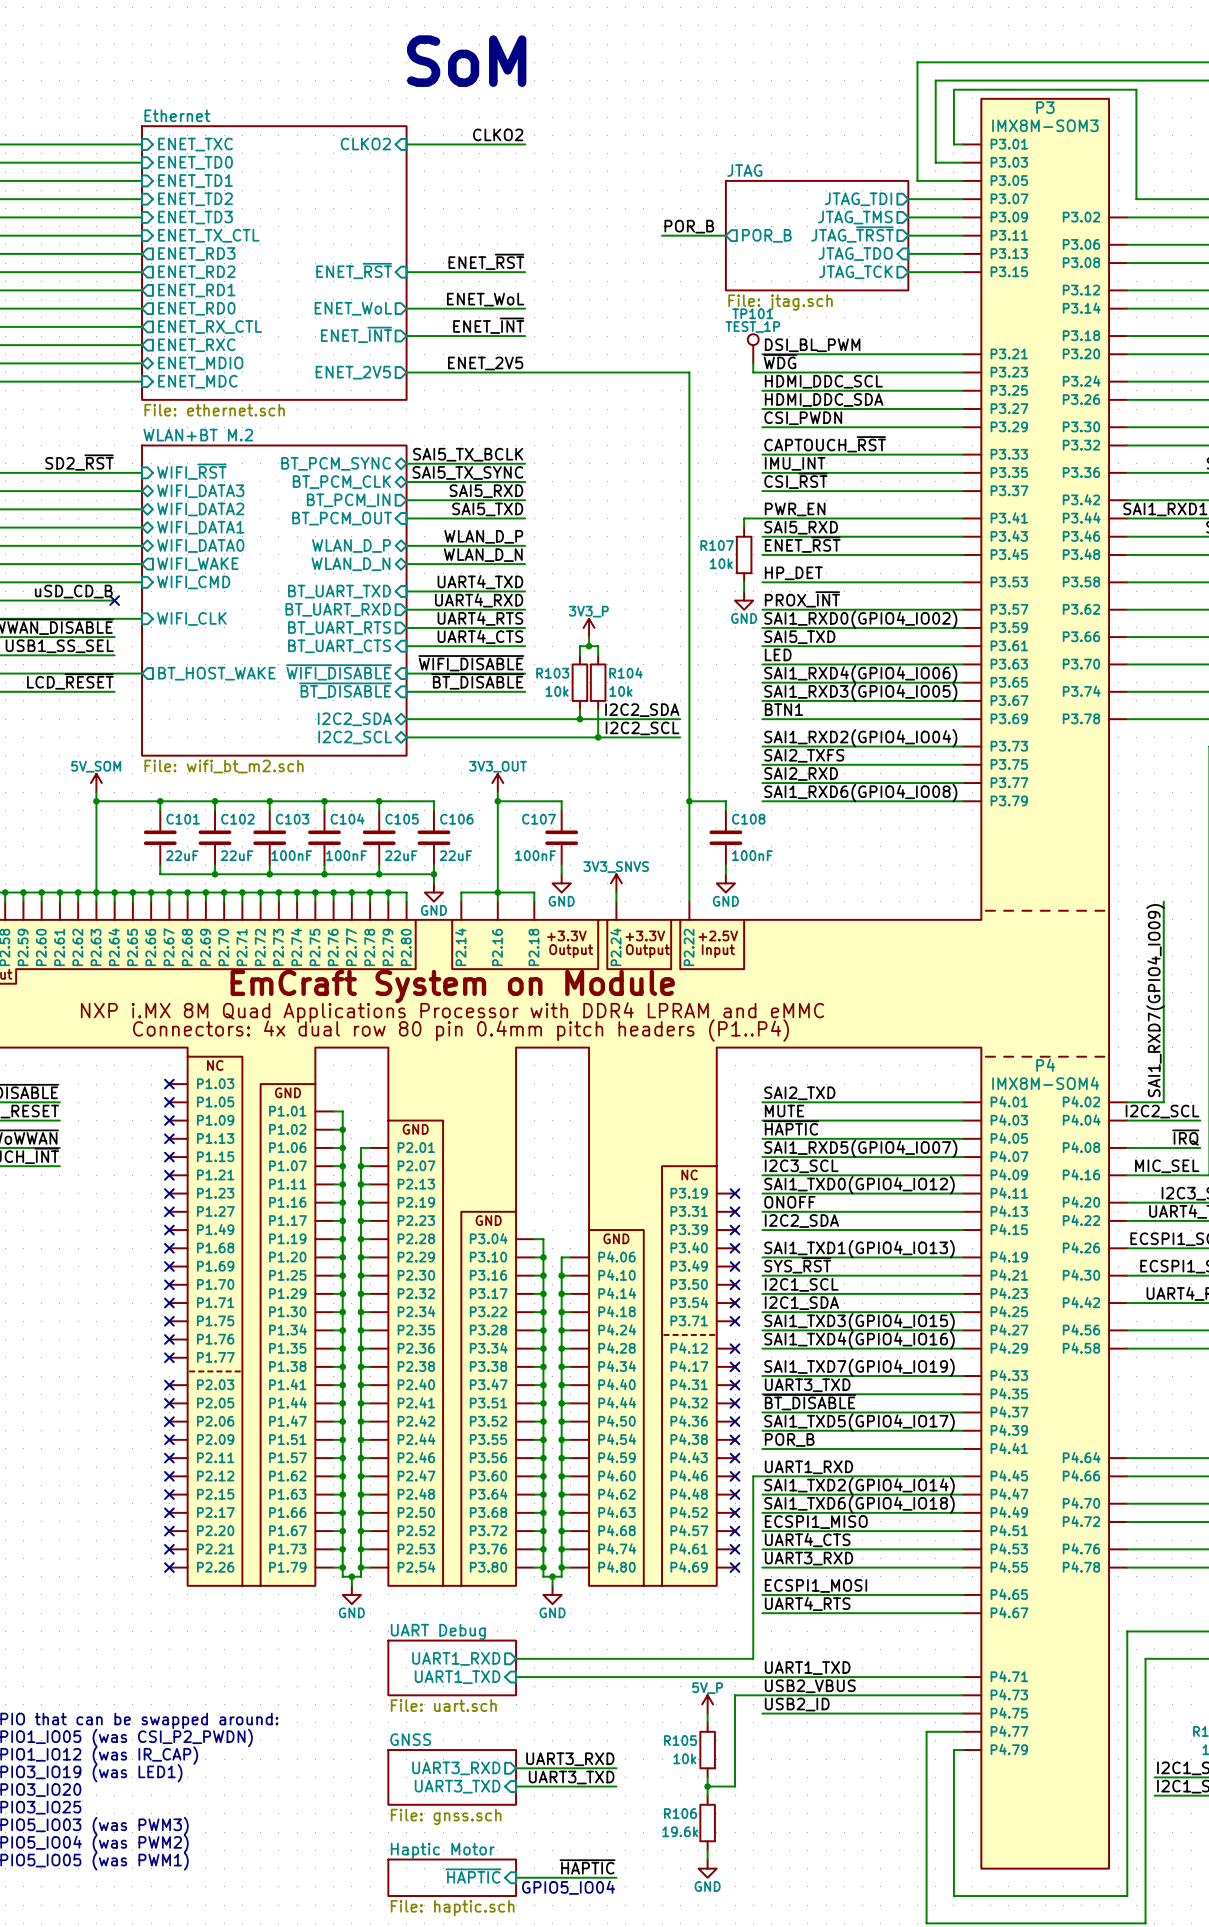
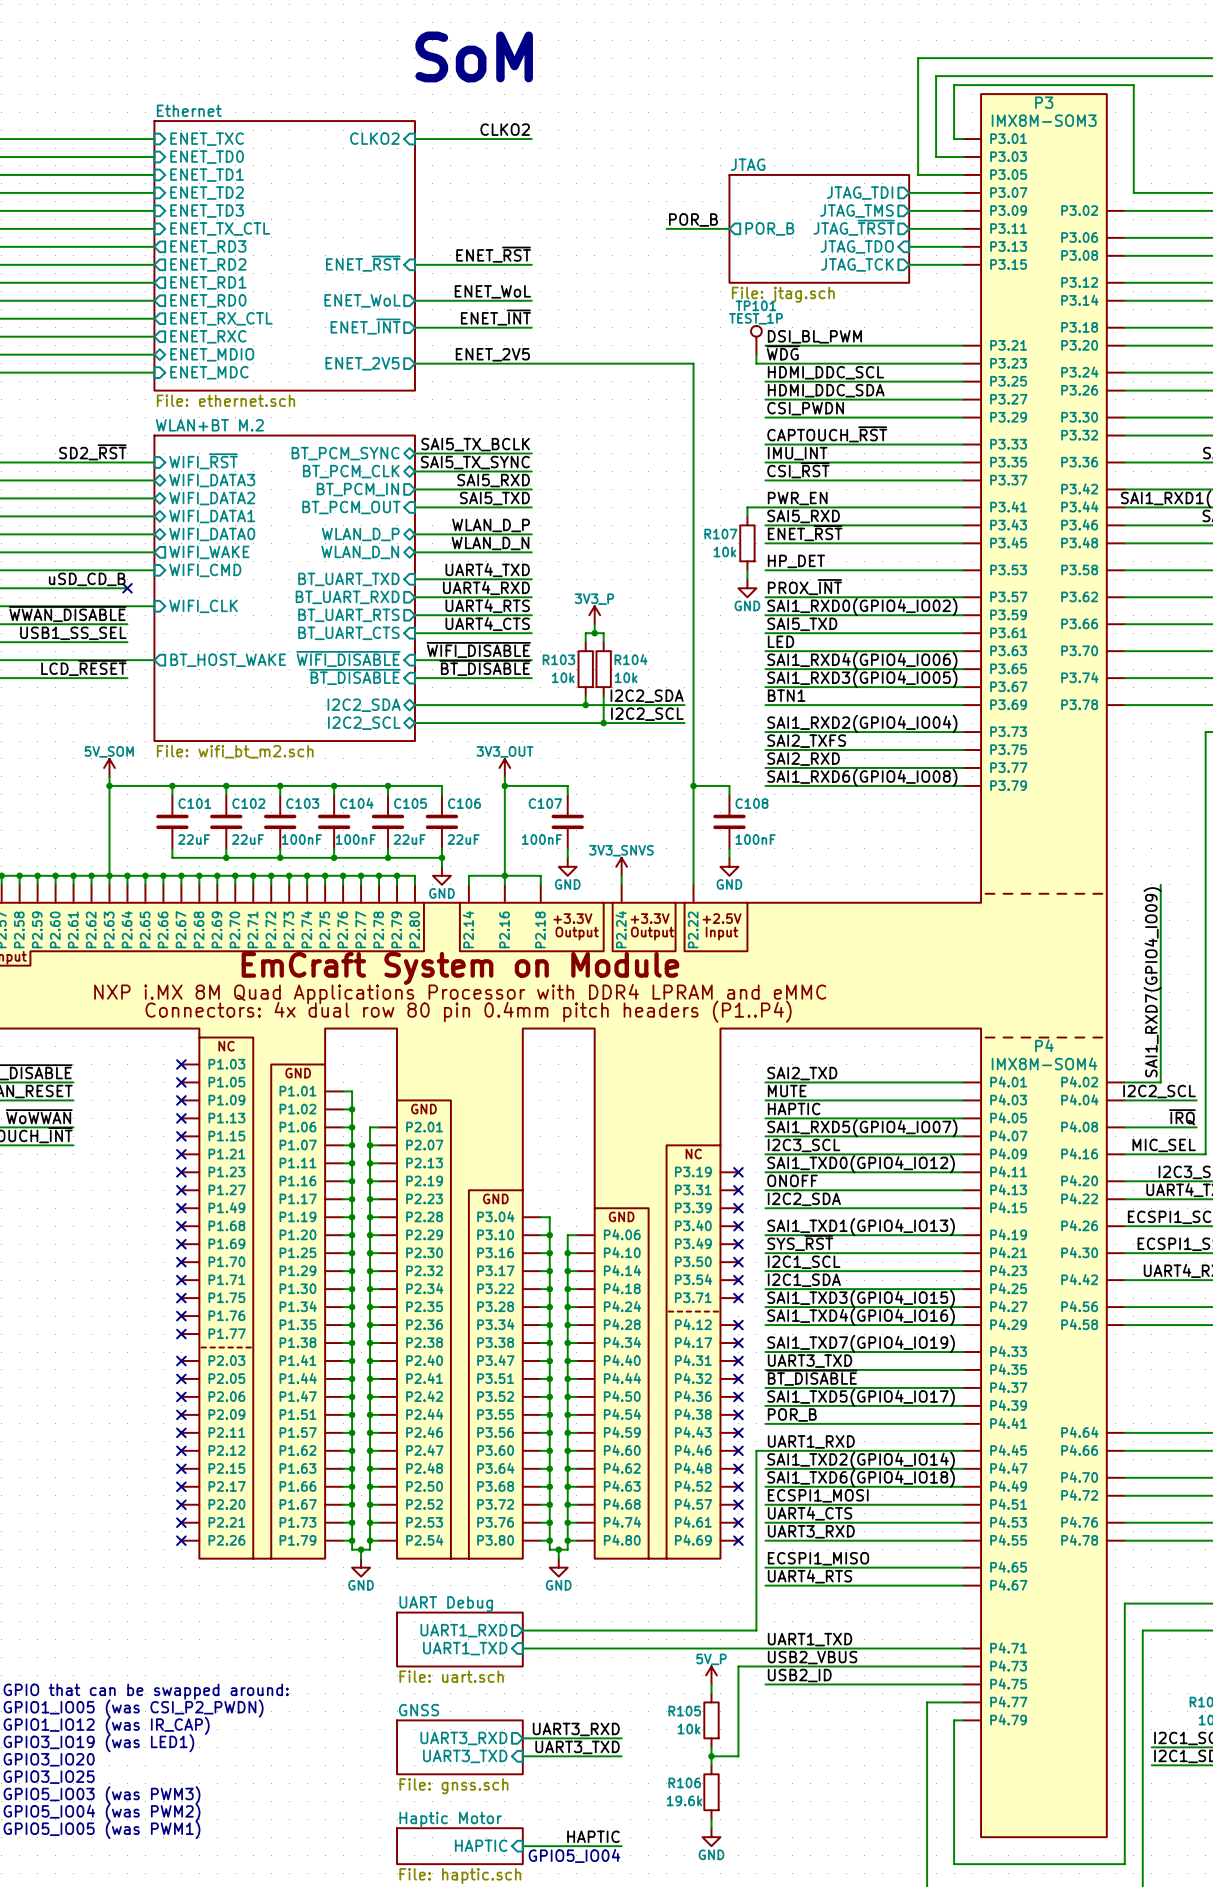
label: ~{HAPTIC} (791, 1128) -> HAPTIC (794, 1108)
label: ECSPI1_MISO (816, 1522) -> ECSPI1_MOSI (818, 1495)
label: ECSPI1_MOSI (816, 1585) -> ECSPI1_MISO (818, 1558)
label: ~{HAPTIC} (587, 1866) -> HAPTIC (593, 1836)
sheet pin: ~{HAPTIC} (473, 1876) -> HAPTIC (481, 1845)

